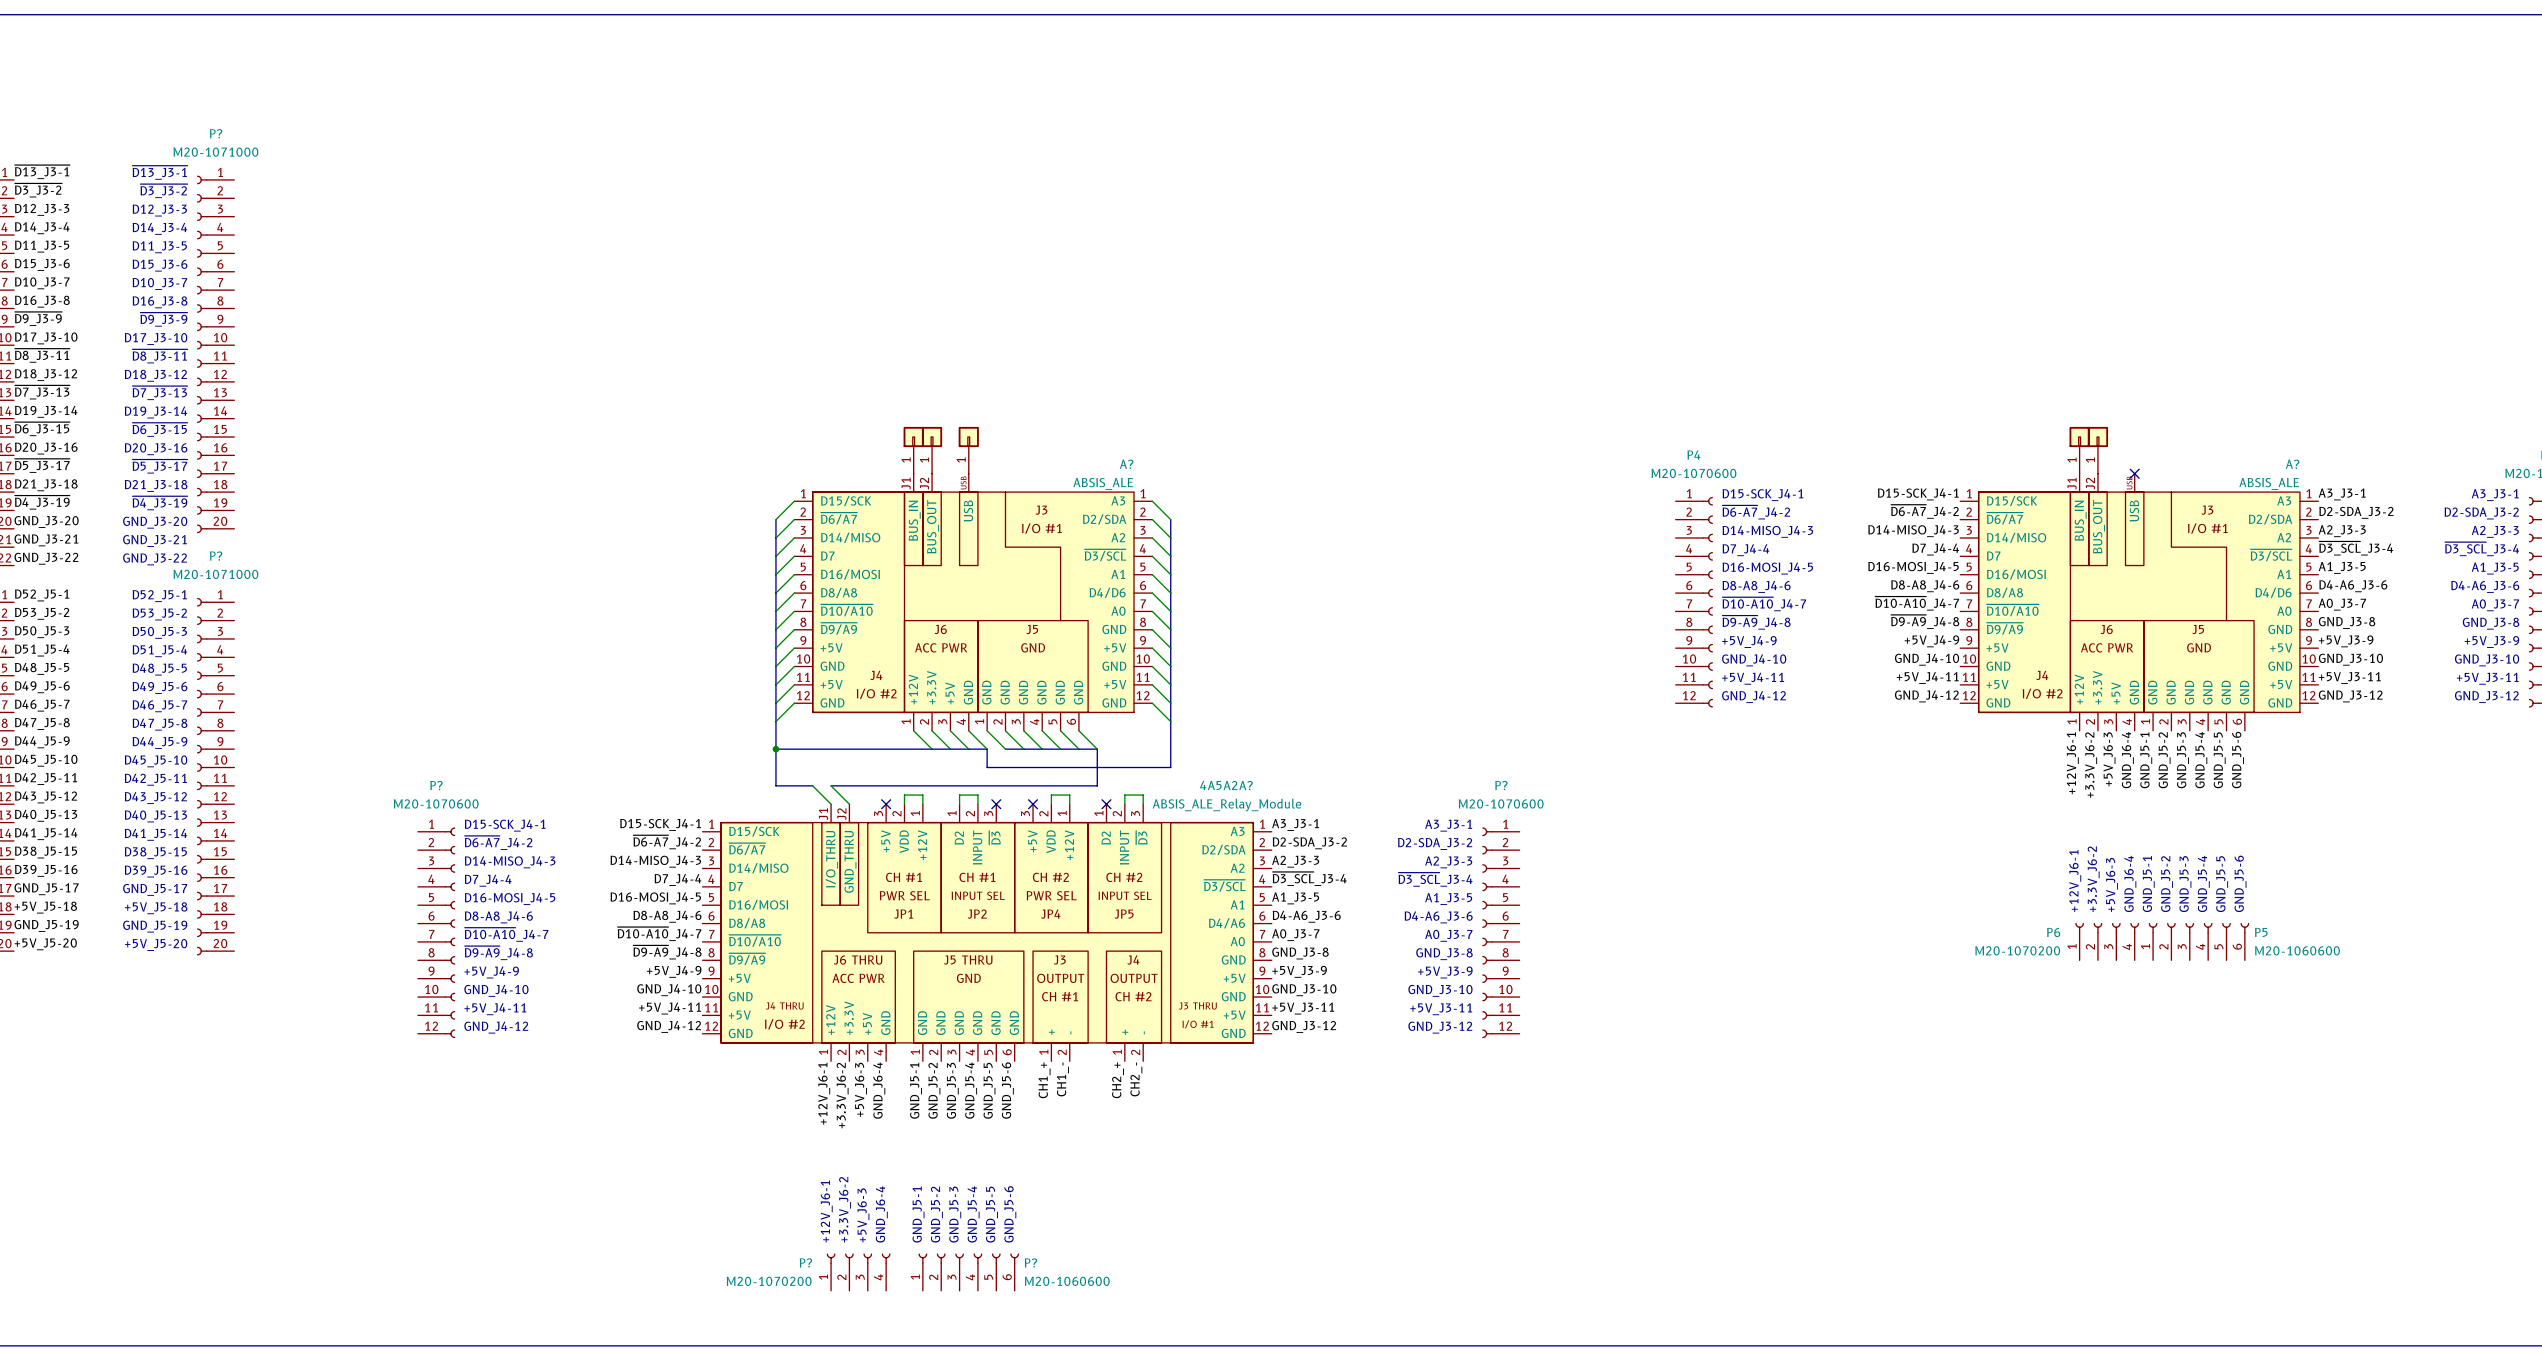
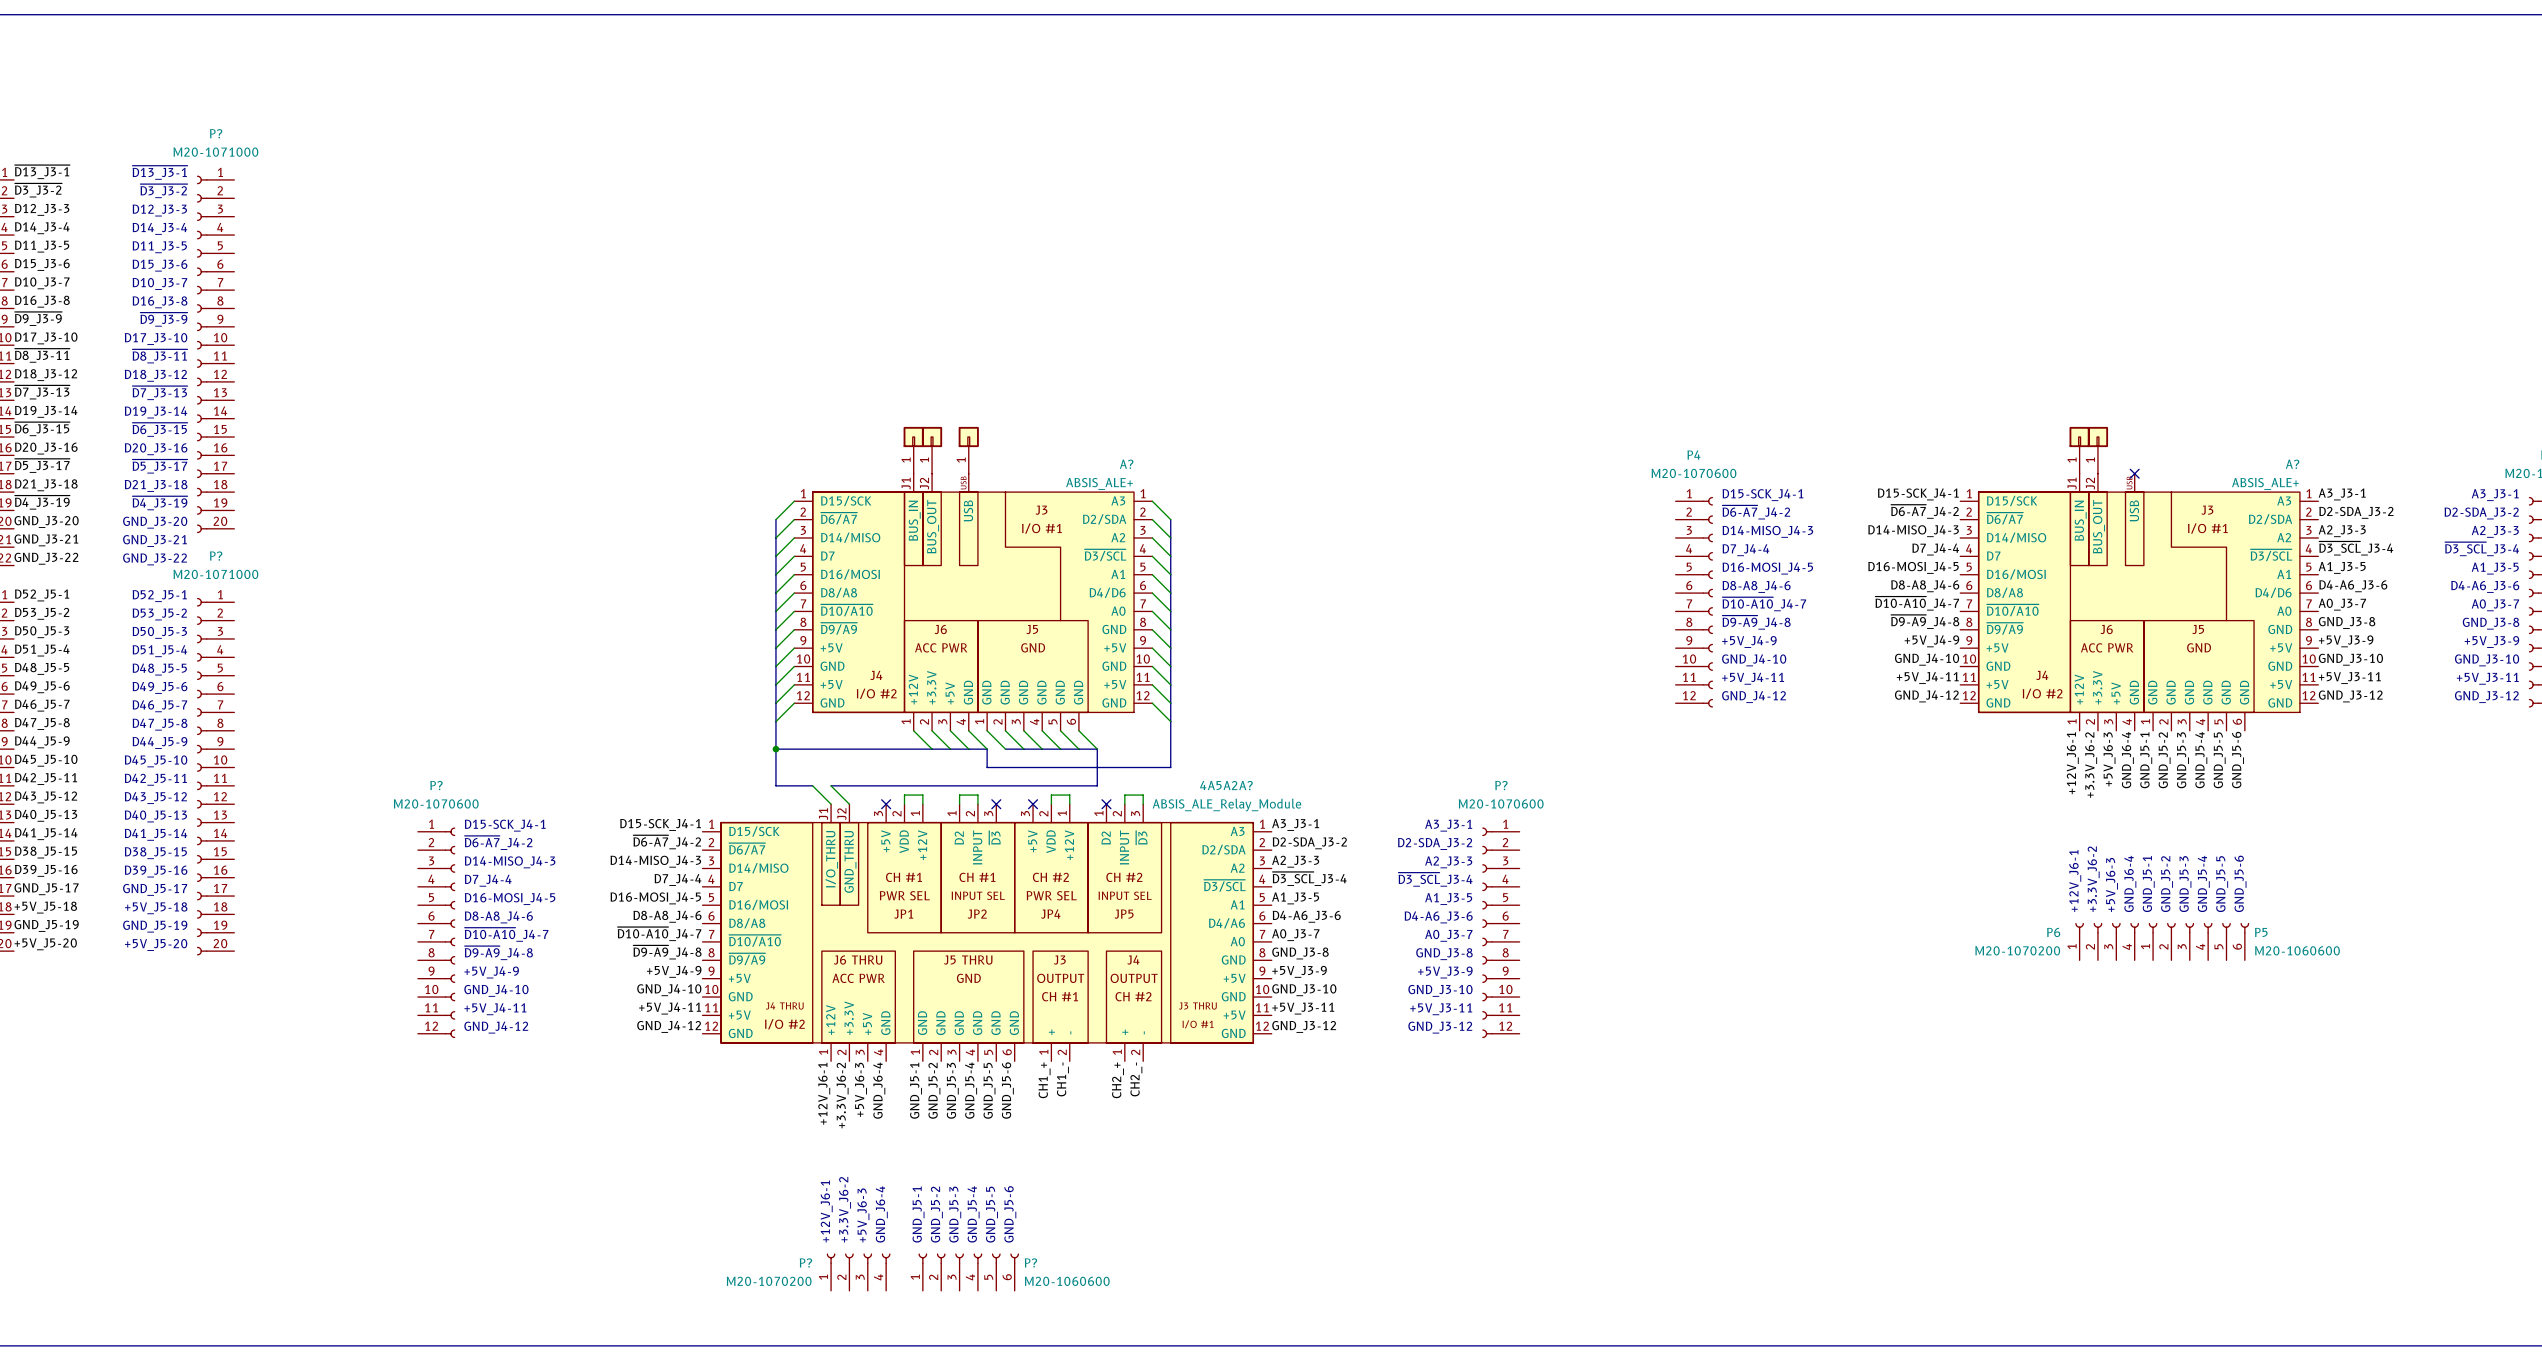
A? value: ABSIS_ALE (1103, 483) -> ABSIS_ALE+ (1099, 483)
A? value: ABSIS_ALE (2269, 483) -> ABSIS_ALE+ (2265, 483)

